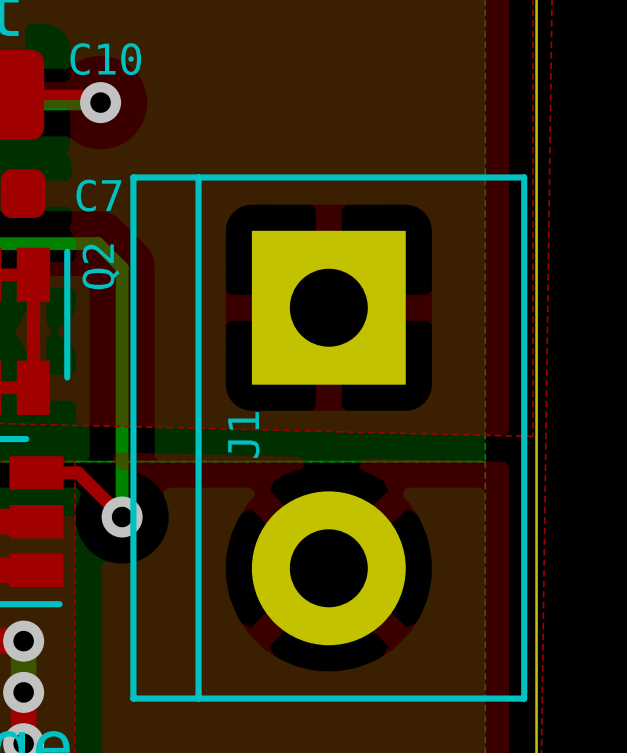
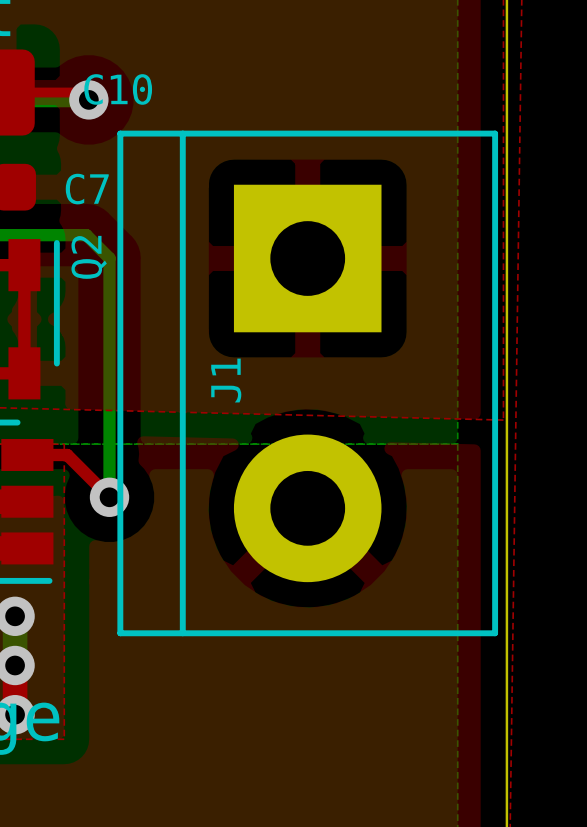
C10 name position: C10 (105, 59) -> C10 (118, 89)
J1 position: (328, 438) -> (307, 383)

